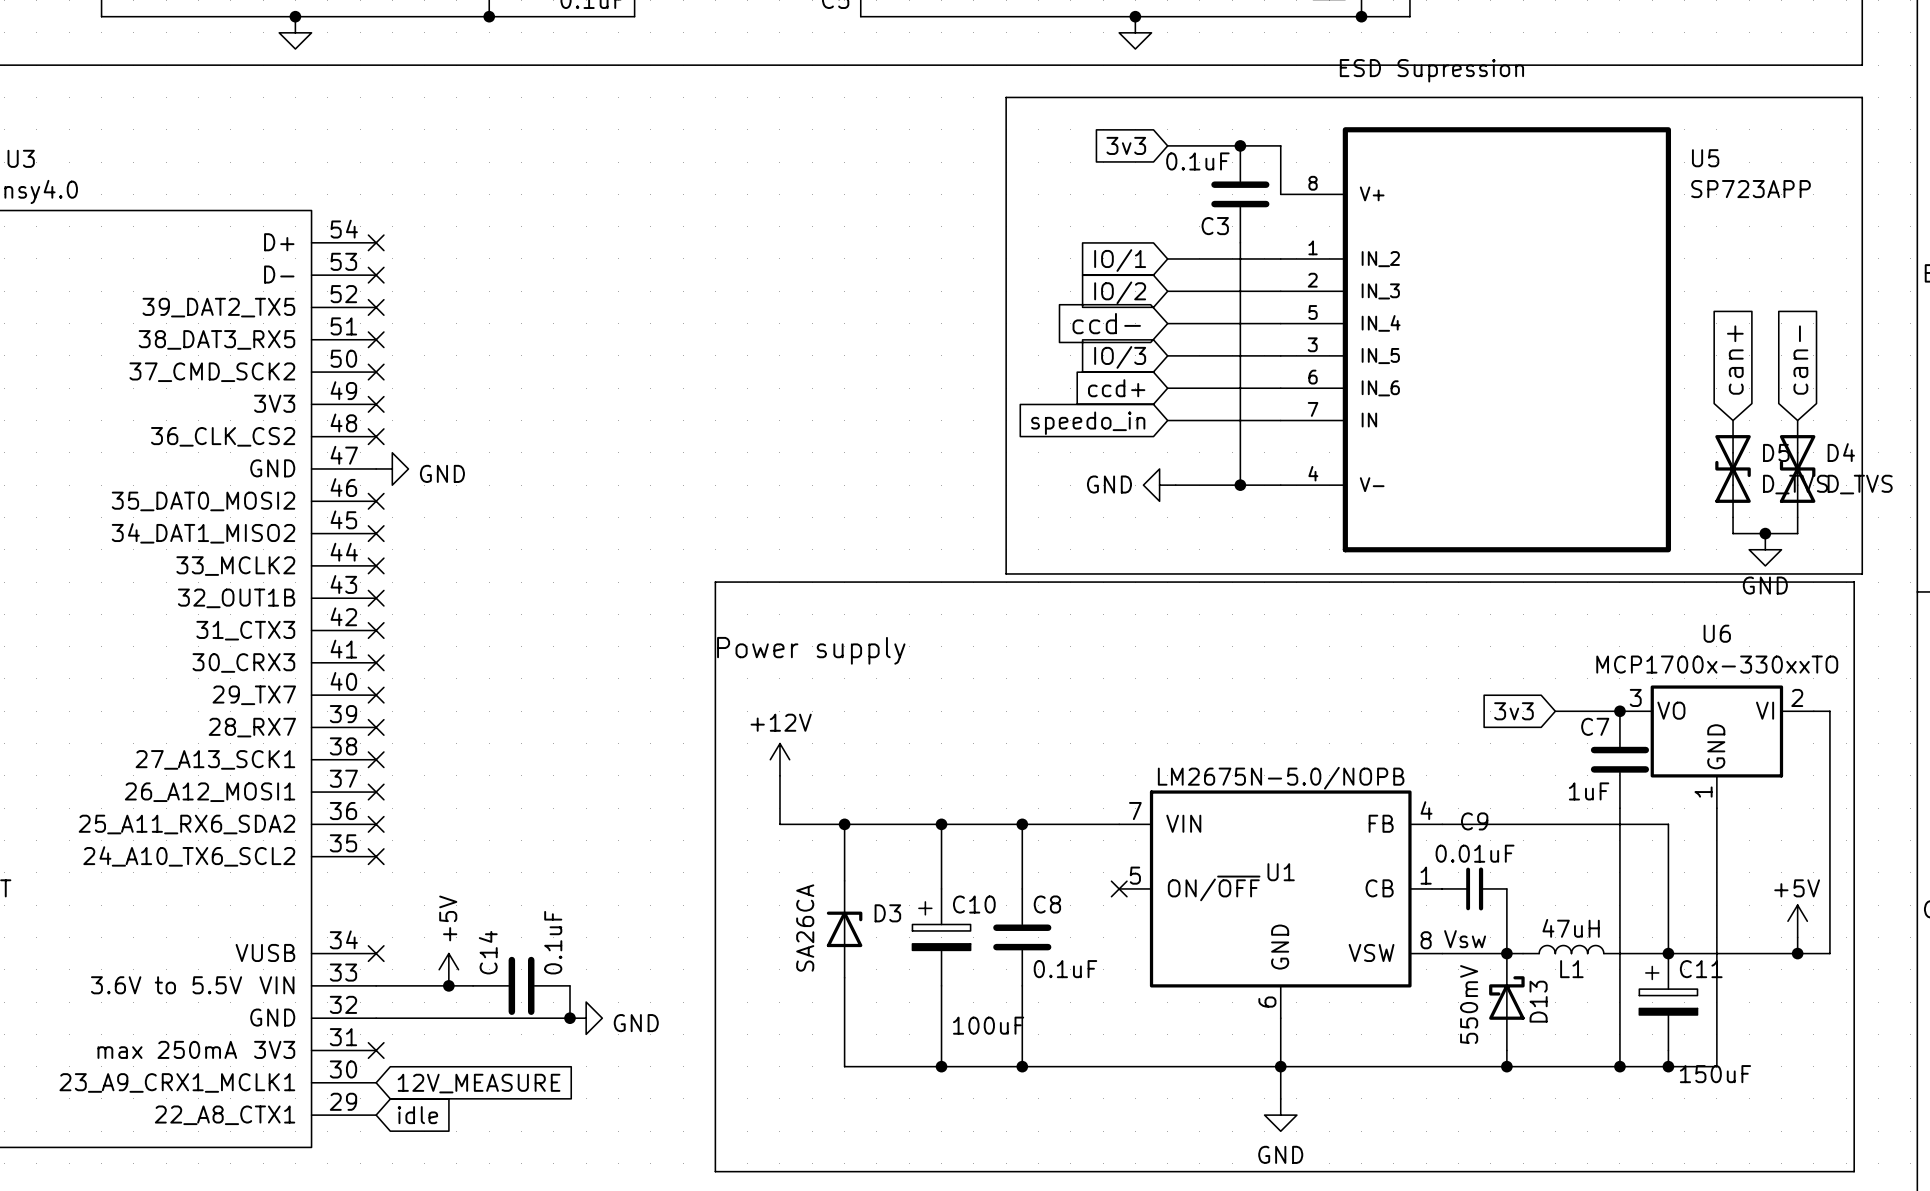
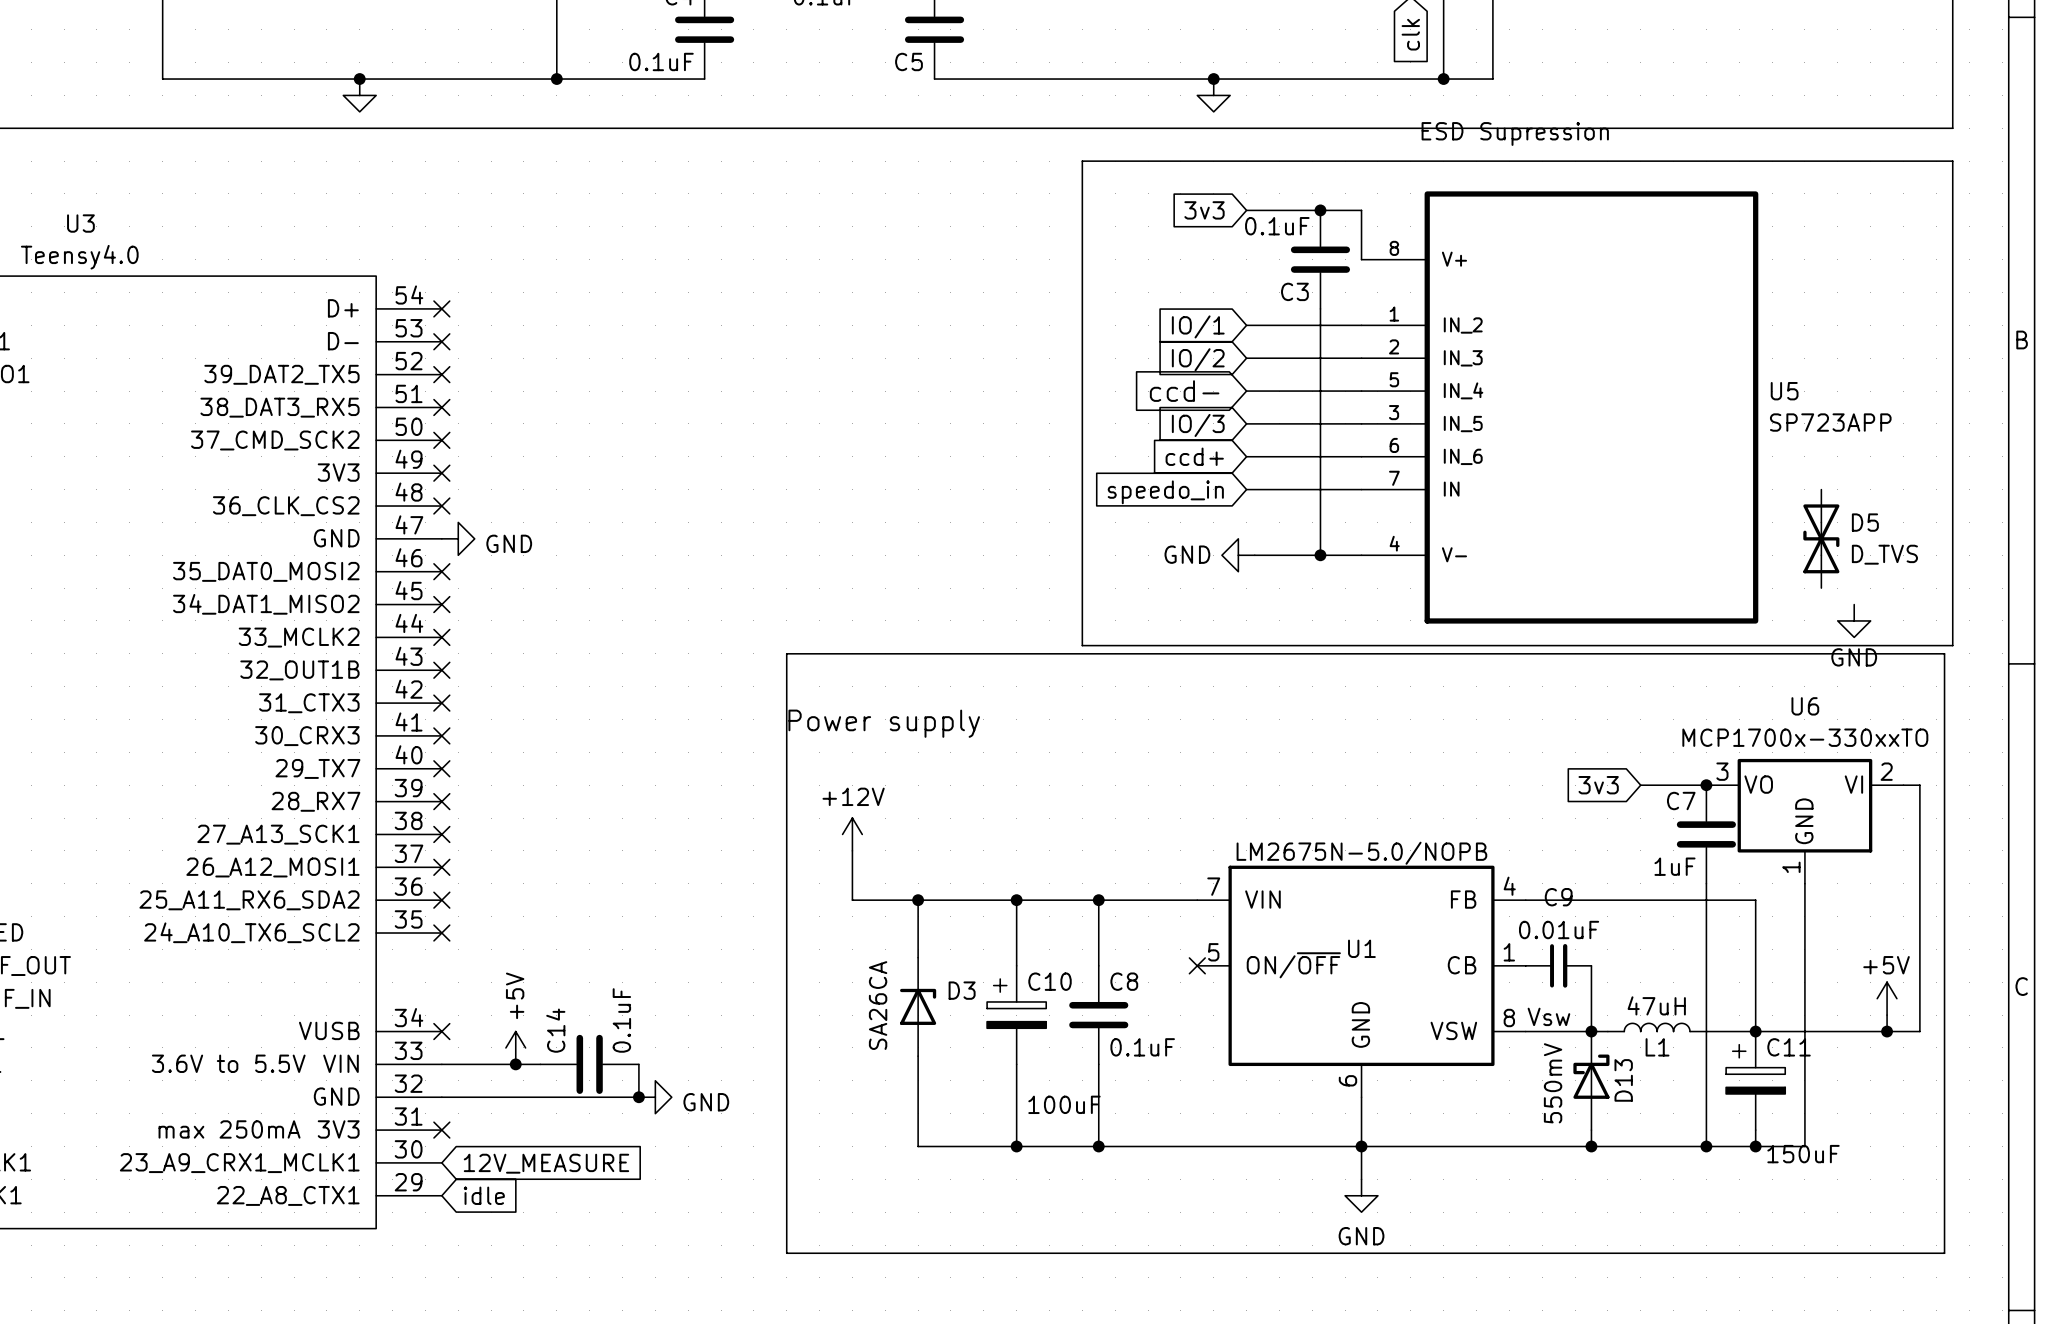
U5 name position: U5 (1705, 158) -> U5 (1784, 391)
U5 value position: SP723APP (1751, 189) -> SP723APP (1830, 422)
global label: can+ (1735, 360) -> none
global label: can- (1800, 360) -> none
D4: D_TVS (1797, 468) -> none
wire: (1733, 517) (1733, 533) (1797, 533) (1797, 517) -> none
junction: (1765, 533) -> none

